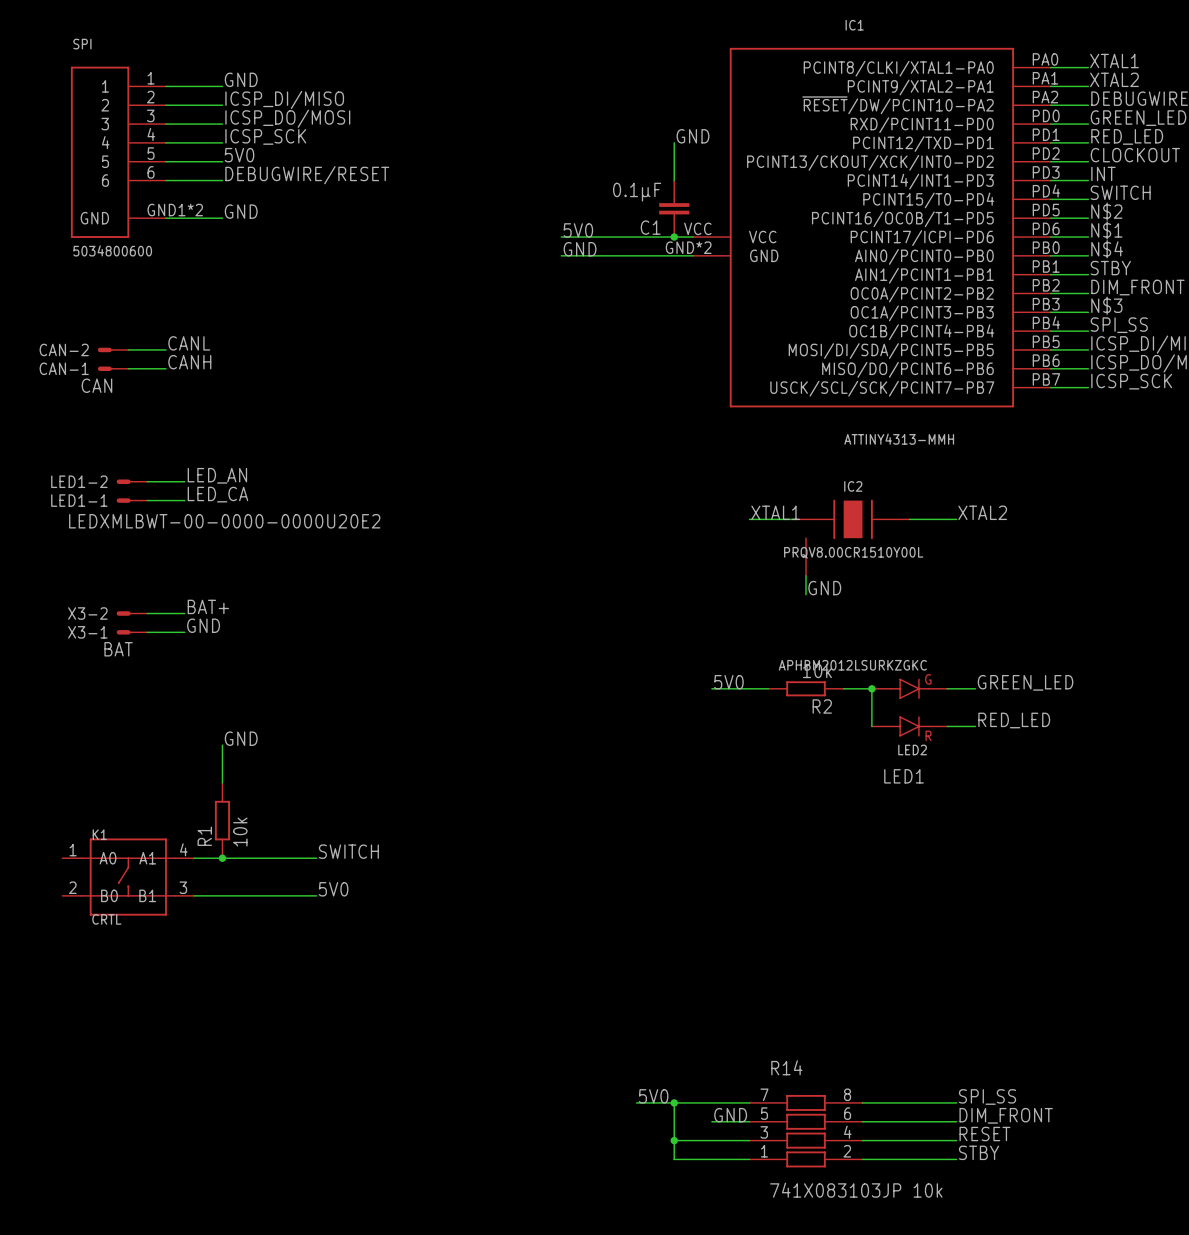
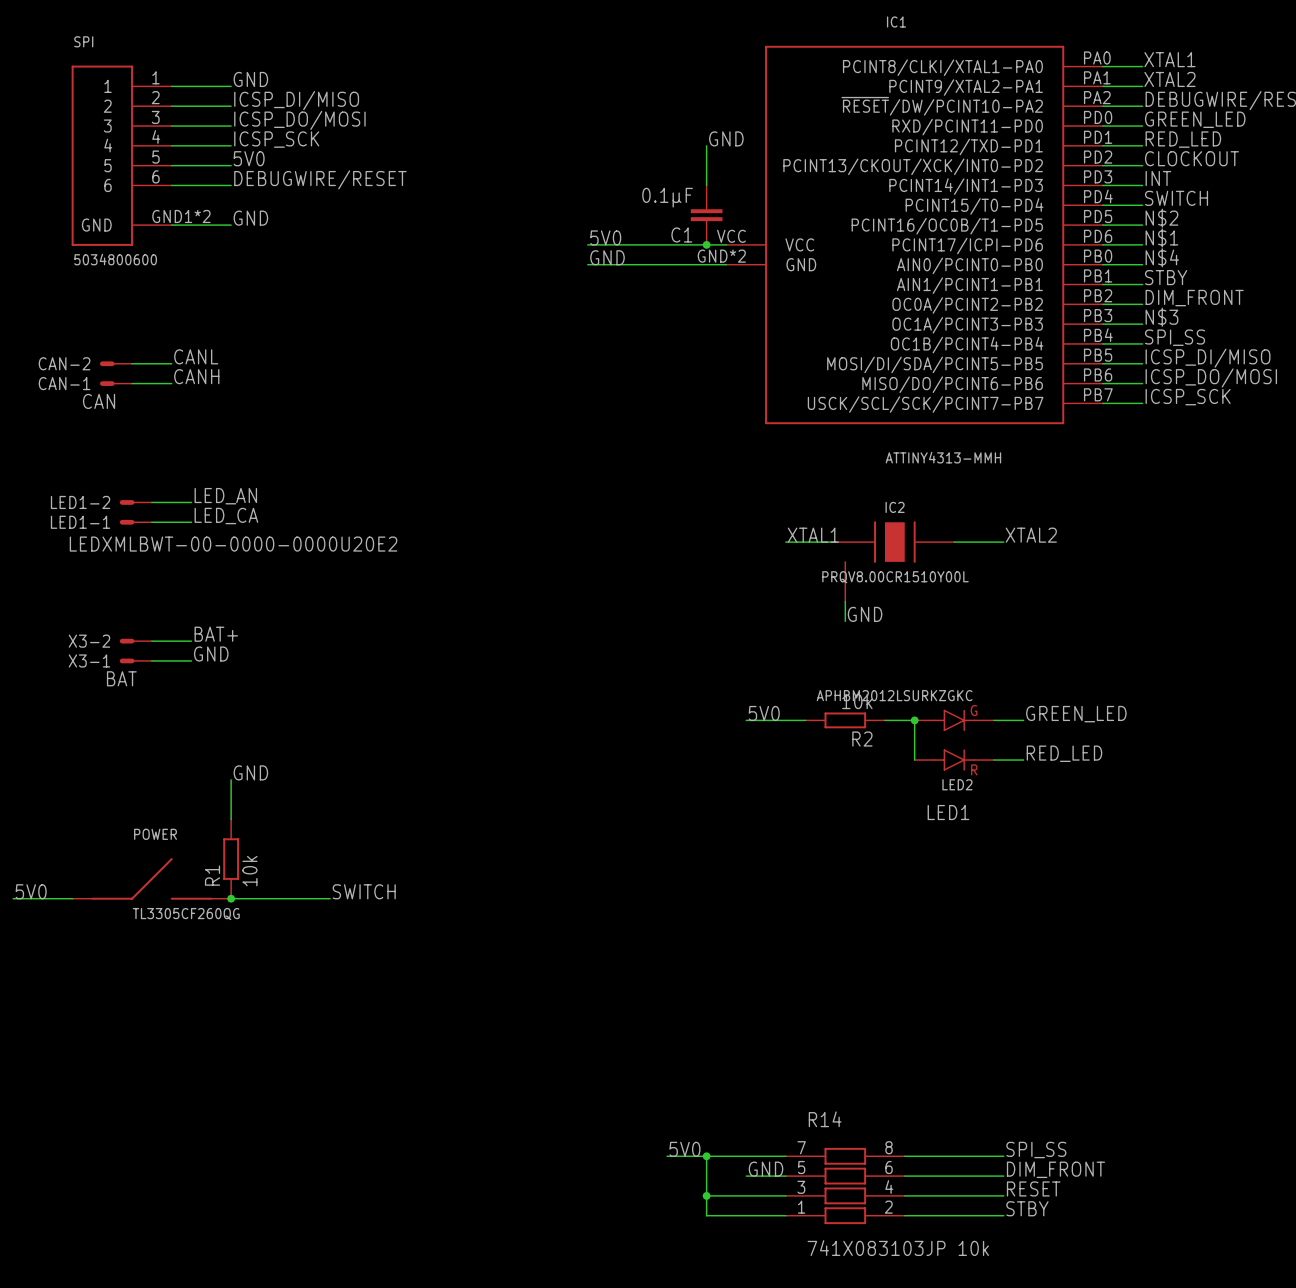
POWER: none -> TL3305CF260QG (151, 878)
label: none -> 5V0 (31, 891)
wire: none -> (13, 898) (72, 898)
K1: CRTL (128, 877) -> none
label: 5V0 (333, 889) -> none
wire: (194, 895) (316, 895) -> none

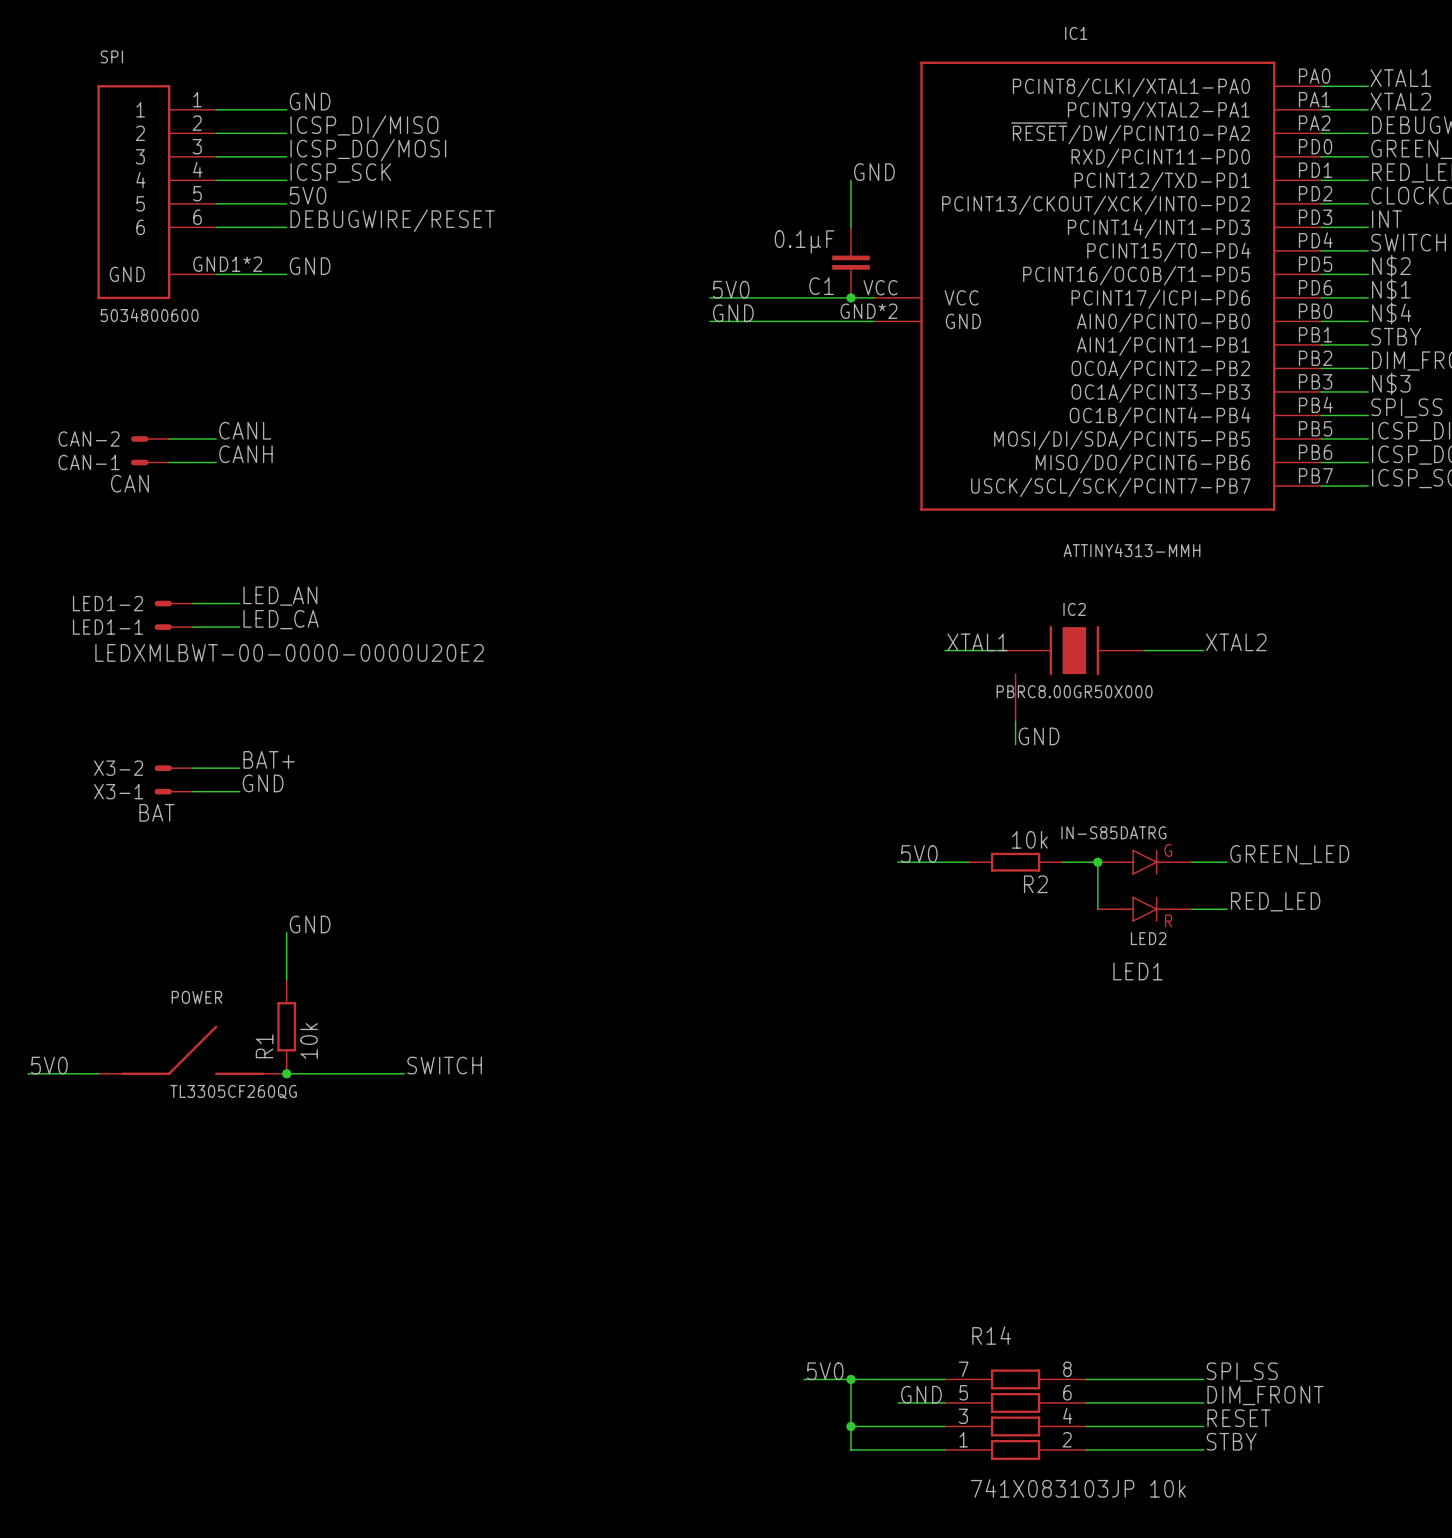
IC2 value: PRQV8.00CR1510Y00L (895, 577) -> PBRC8.00GR50X000 (1074, 691)
LED2 value: APHBM2012LSURKZGKC (894, 695) -> IN-S85DATRG (1113, 832)

